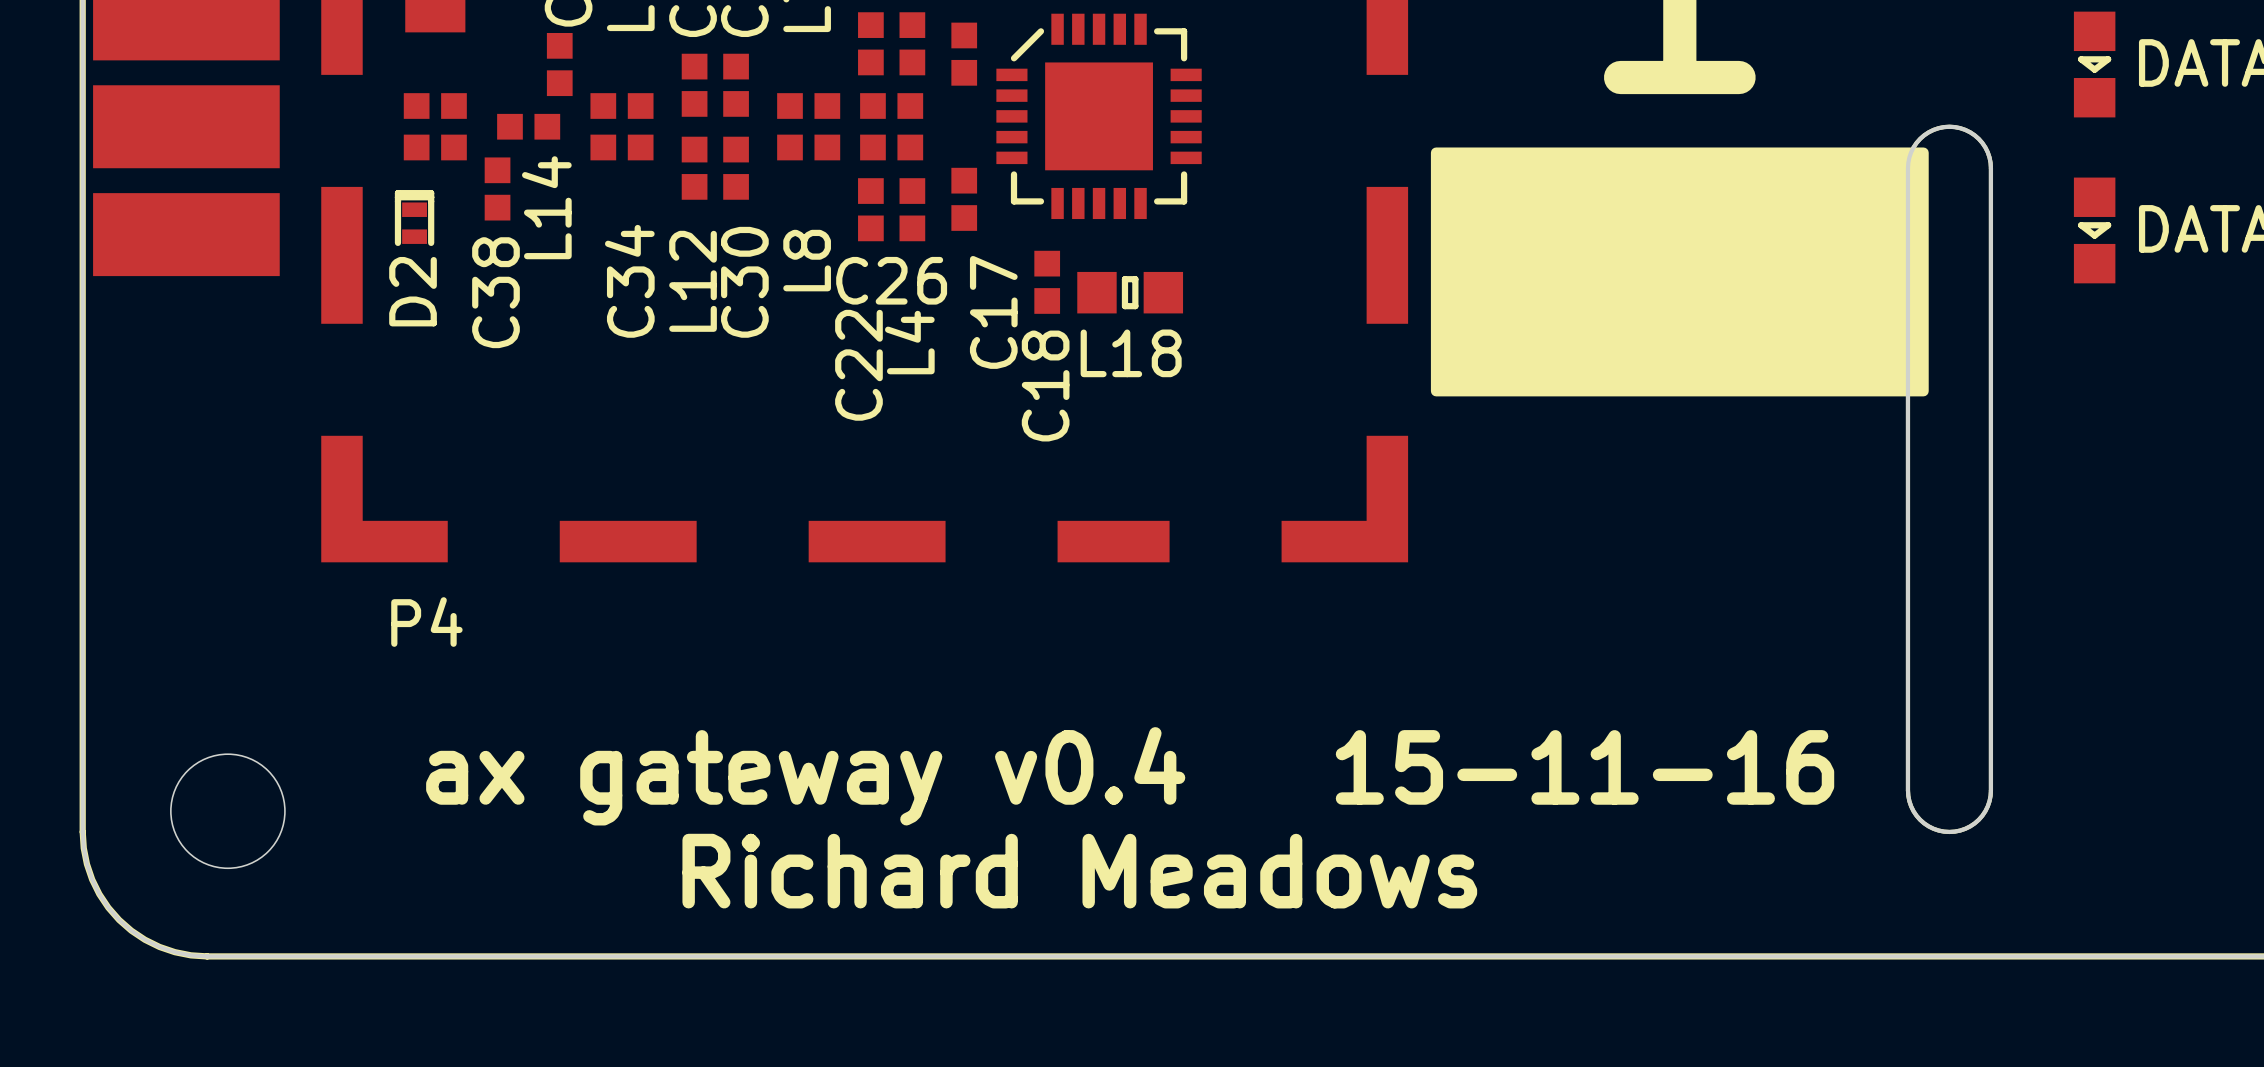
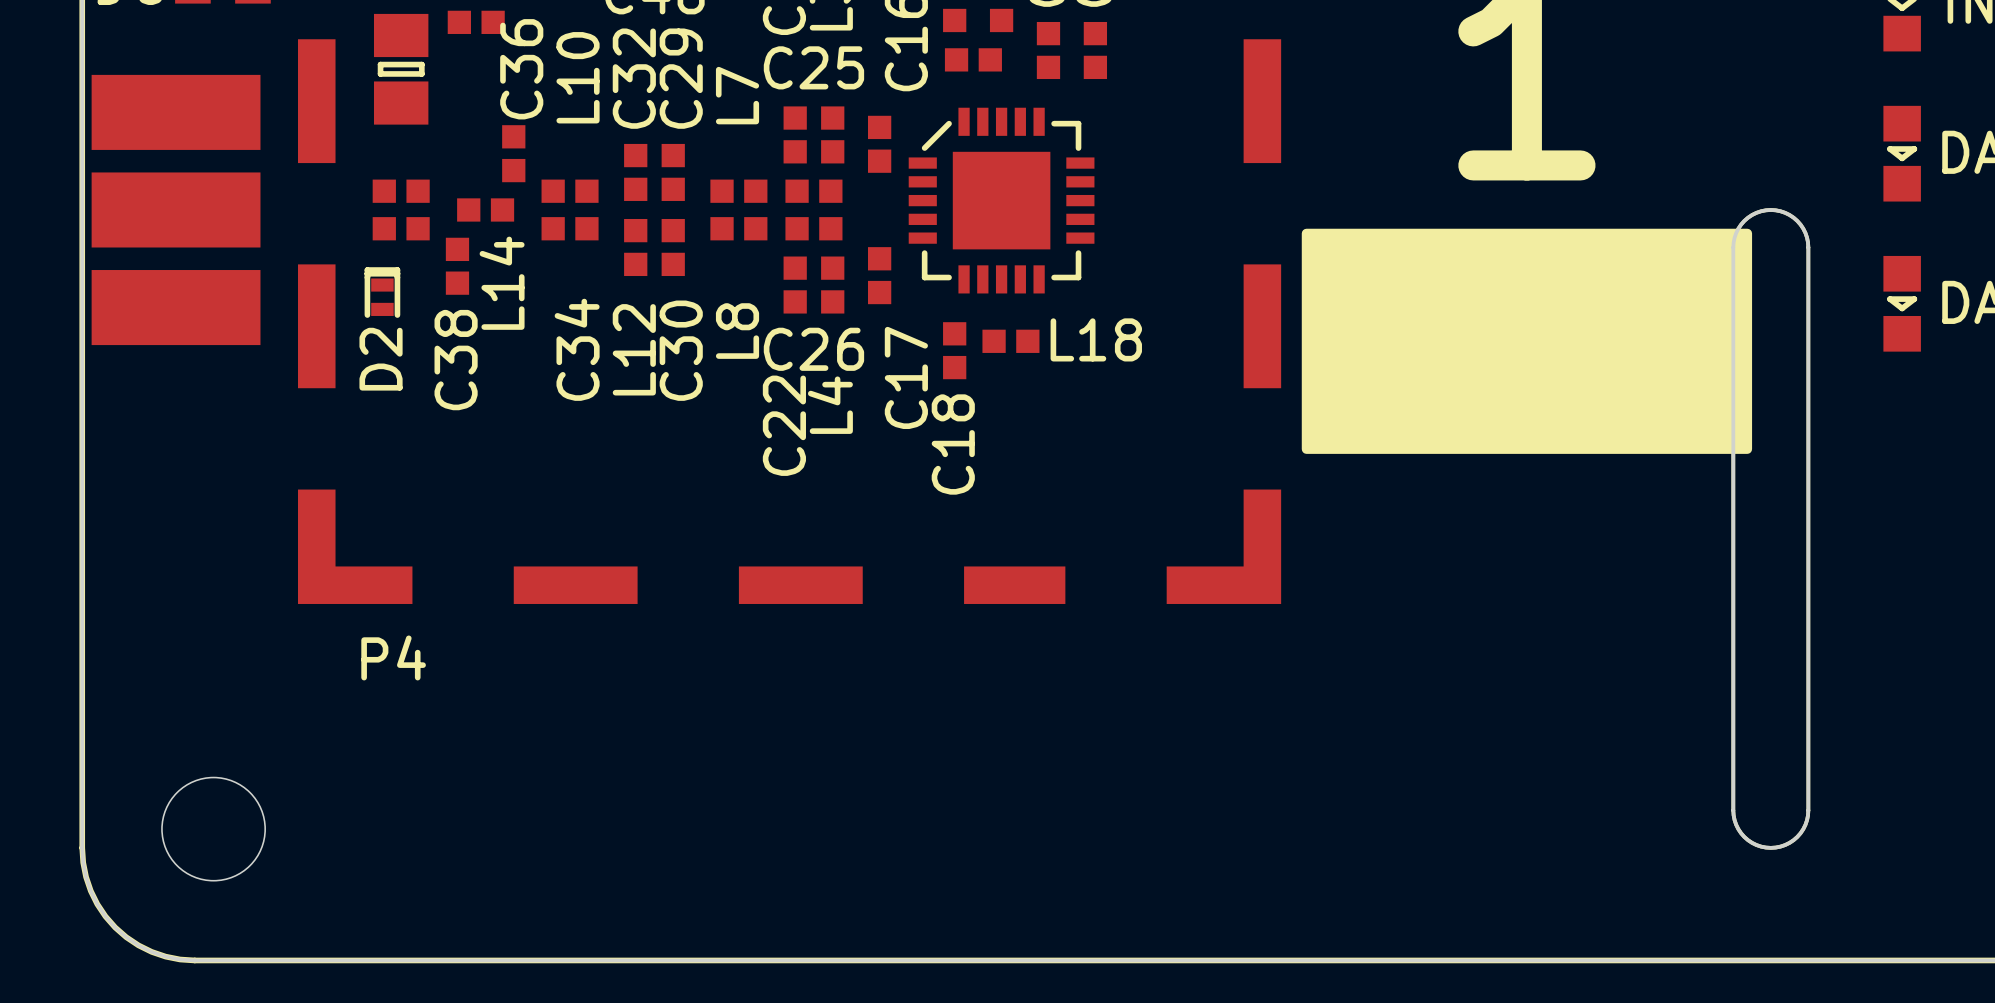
L18 footprint: [1077, 271, 1184, 314] -> [982, 329, 1040, 353]
L18 name position: L18 (1131, 353) -> L18 (1096, 339)
text: ax gateway v0.4 15-11-16 (1130, 776) -> none
text: Richard Meadows (1079, 871) -> none

